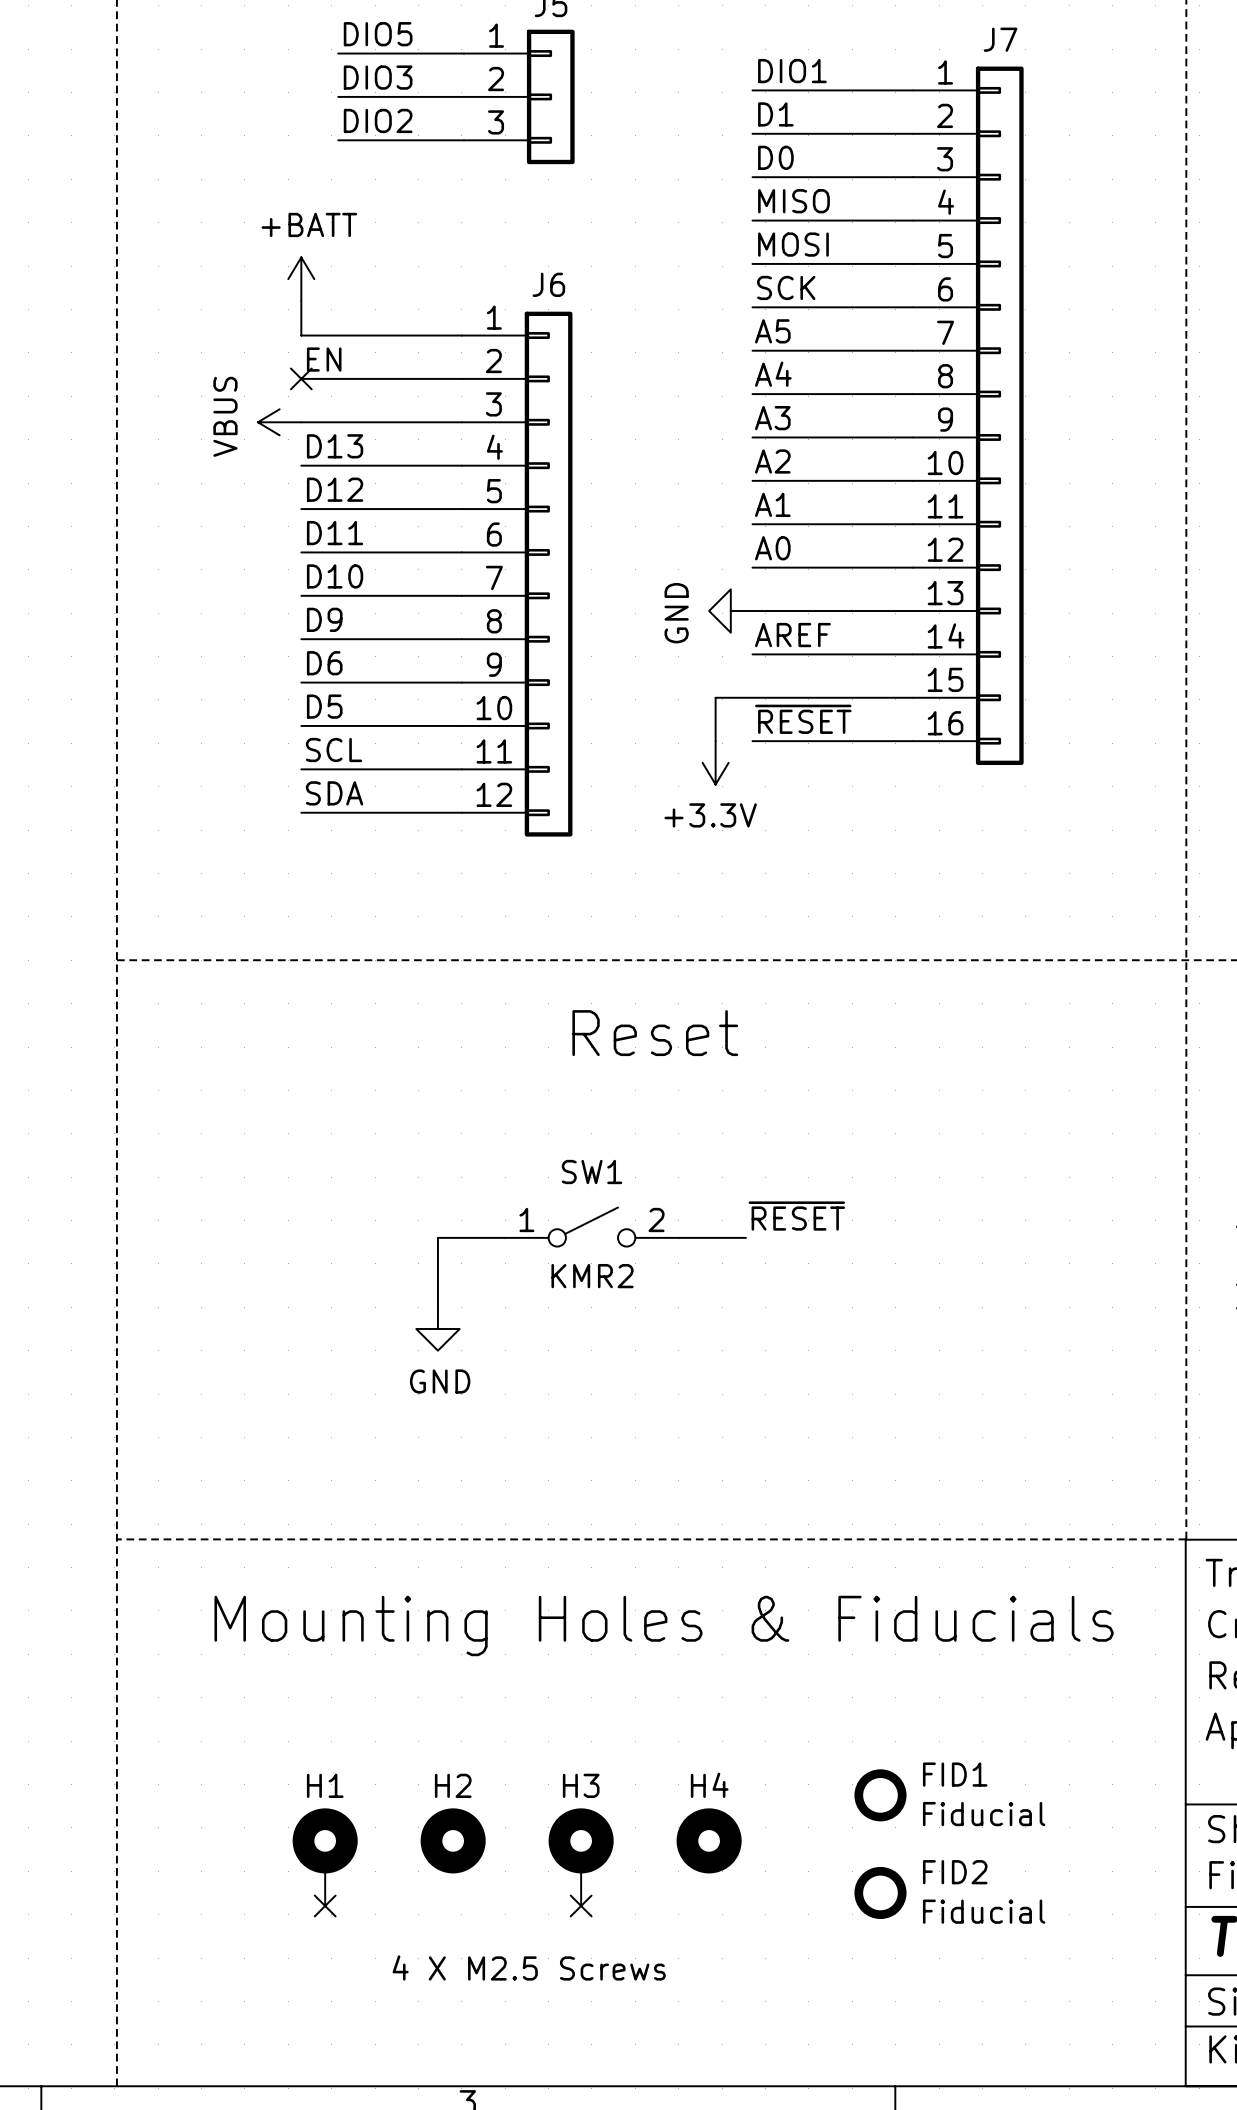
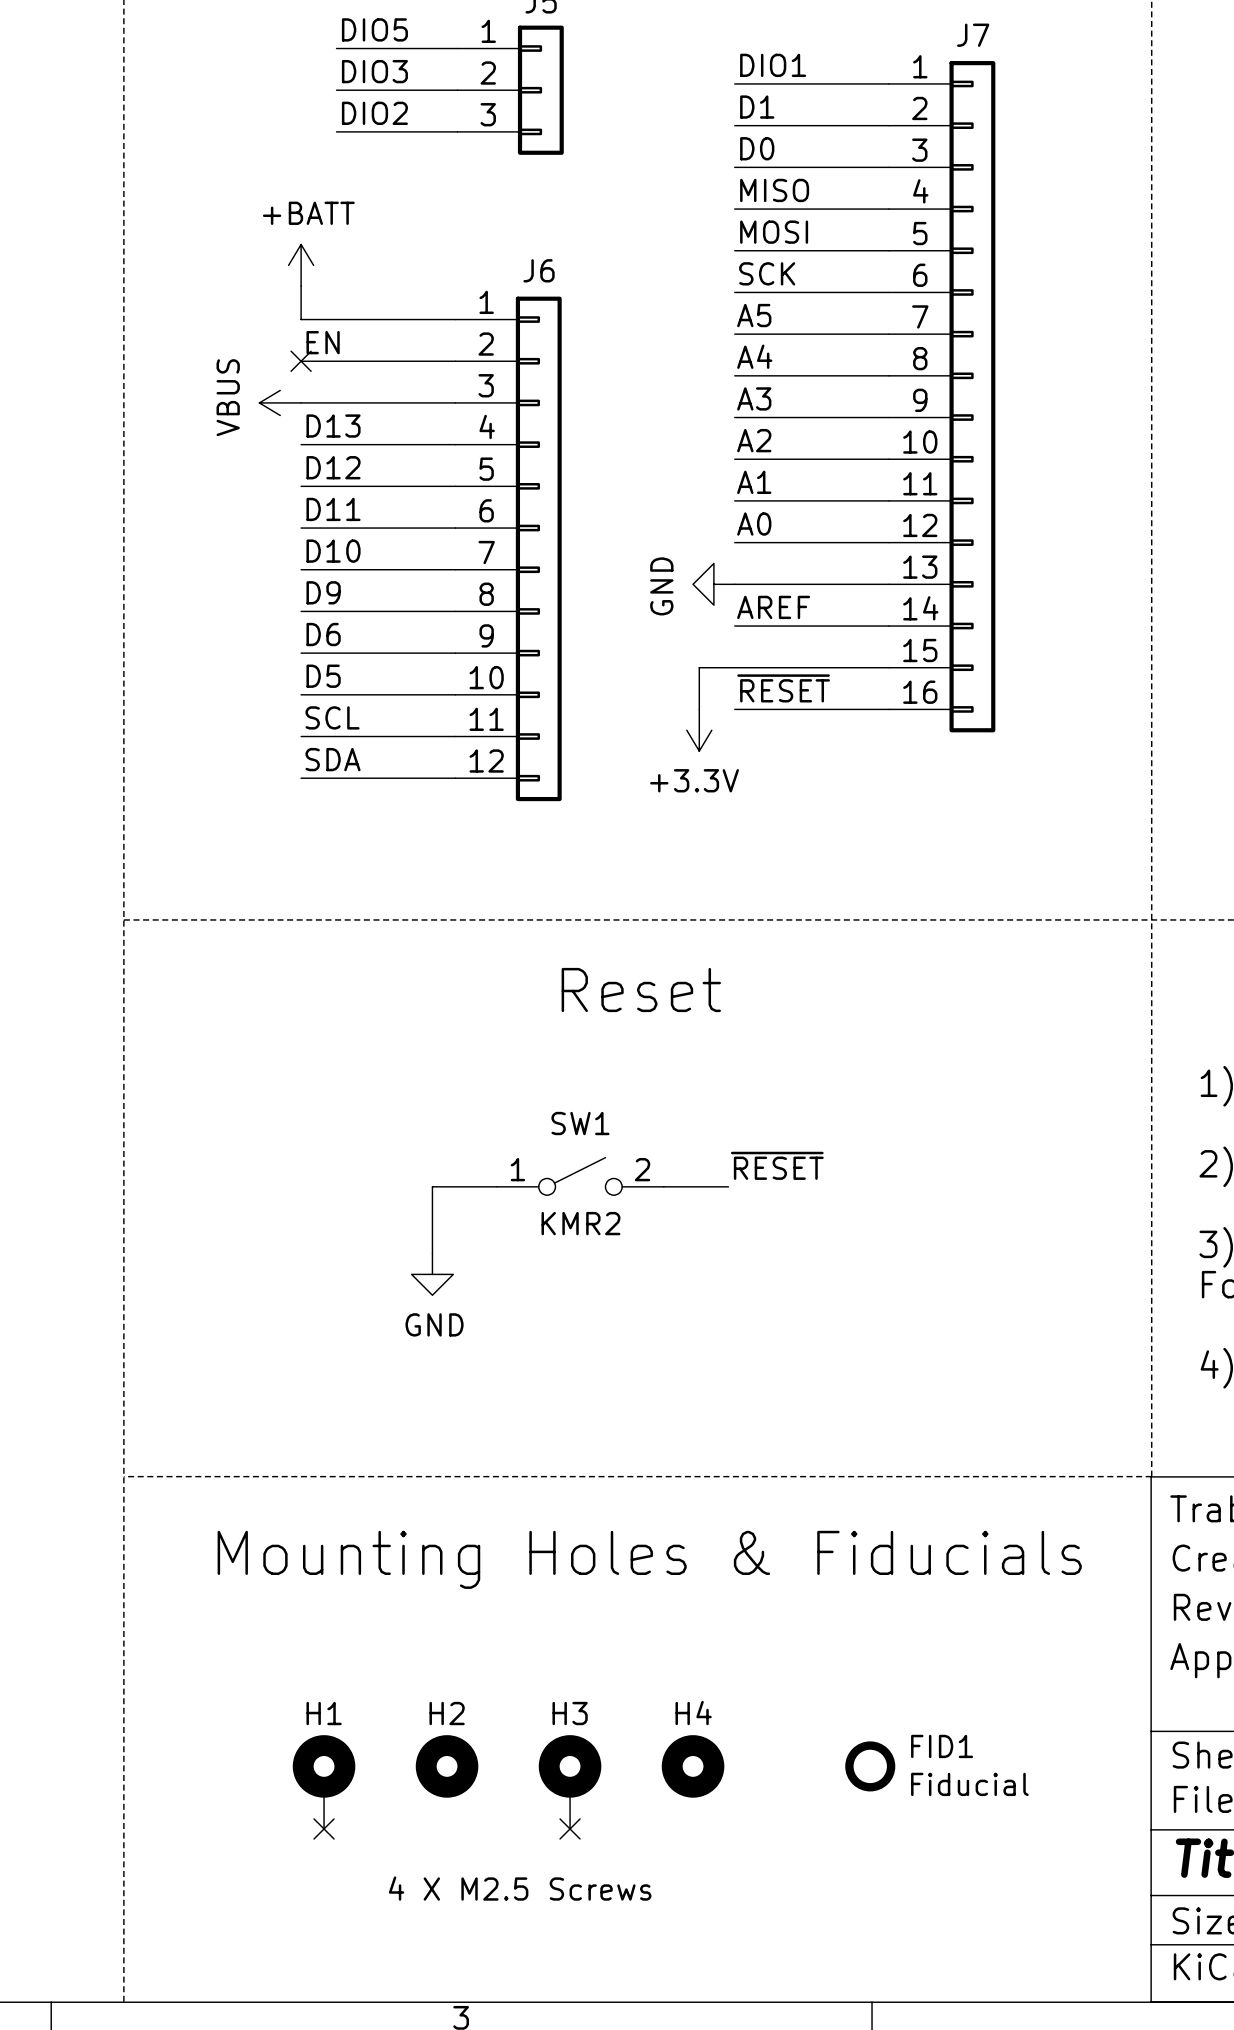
FID1 position: (880, 1795) -> (870, 1766)
FID2: Fiducial (880, 1892) -> none

